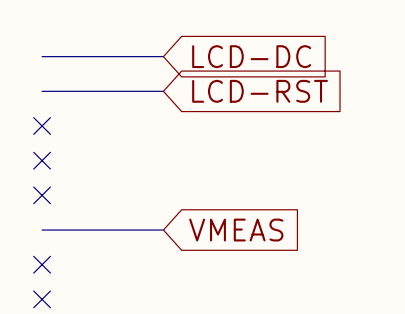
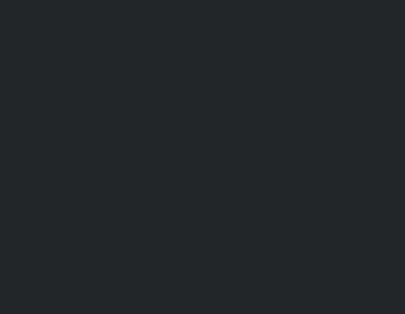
wire: (42, 56) (163, 56) -> none
global label: LCD-DC (251, 56) -> none
wire: (42, 91) (163, 91) -> none
global label: LCD-RST (260, 91) -> none
no-connect mark: (42, 126) -> none
no-connect mark: (42, 160) -> none
no-connect mark: (42, 195) -> none
wire: (42, 230) (163, 230) -> none
global label: VMEAS (236, 230) -> none
no-connect mark: (42, 264) -> none
no-connect mark: (42, 299) -> none

